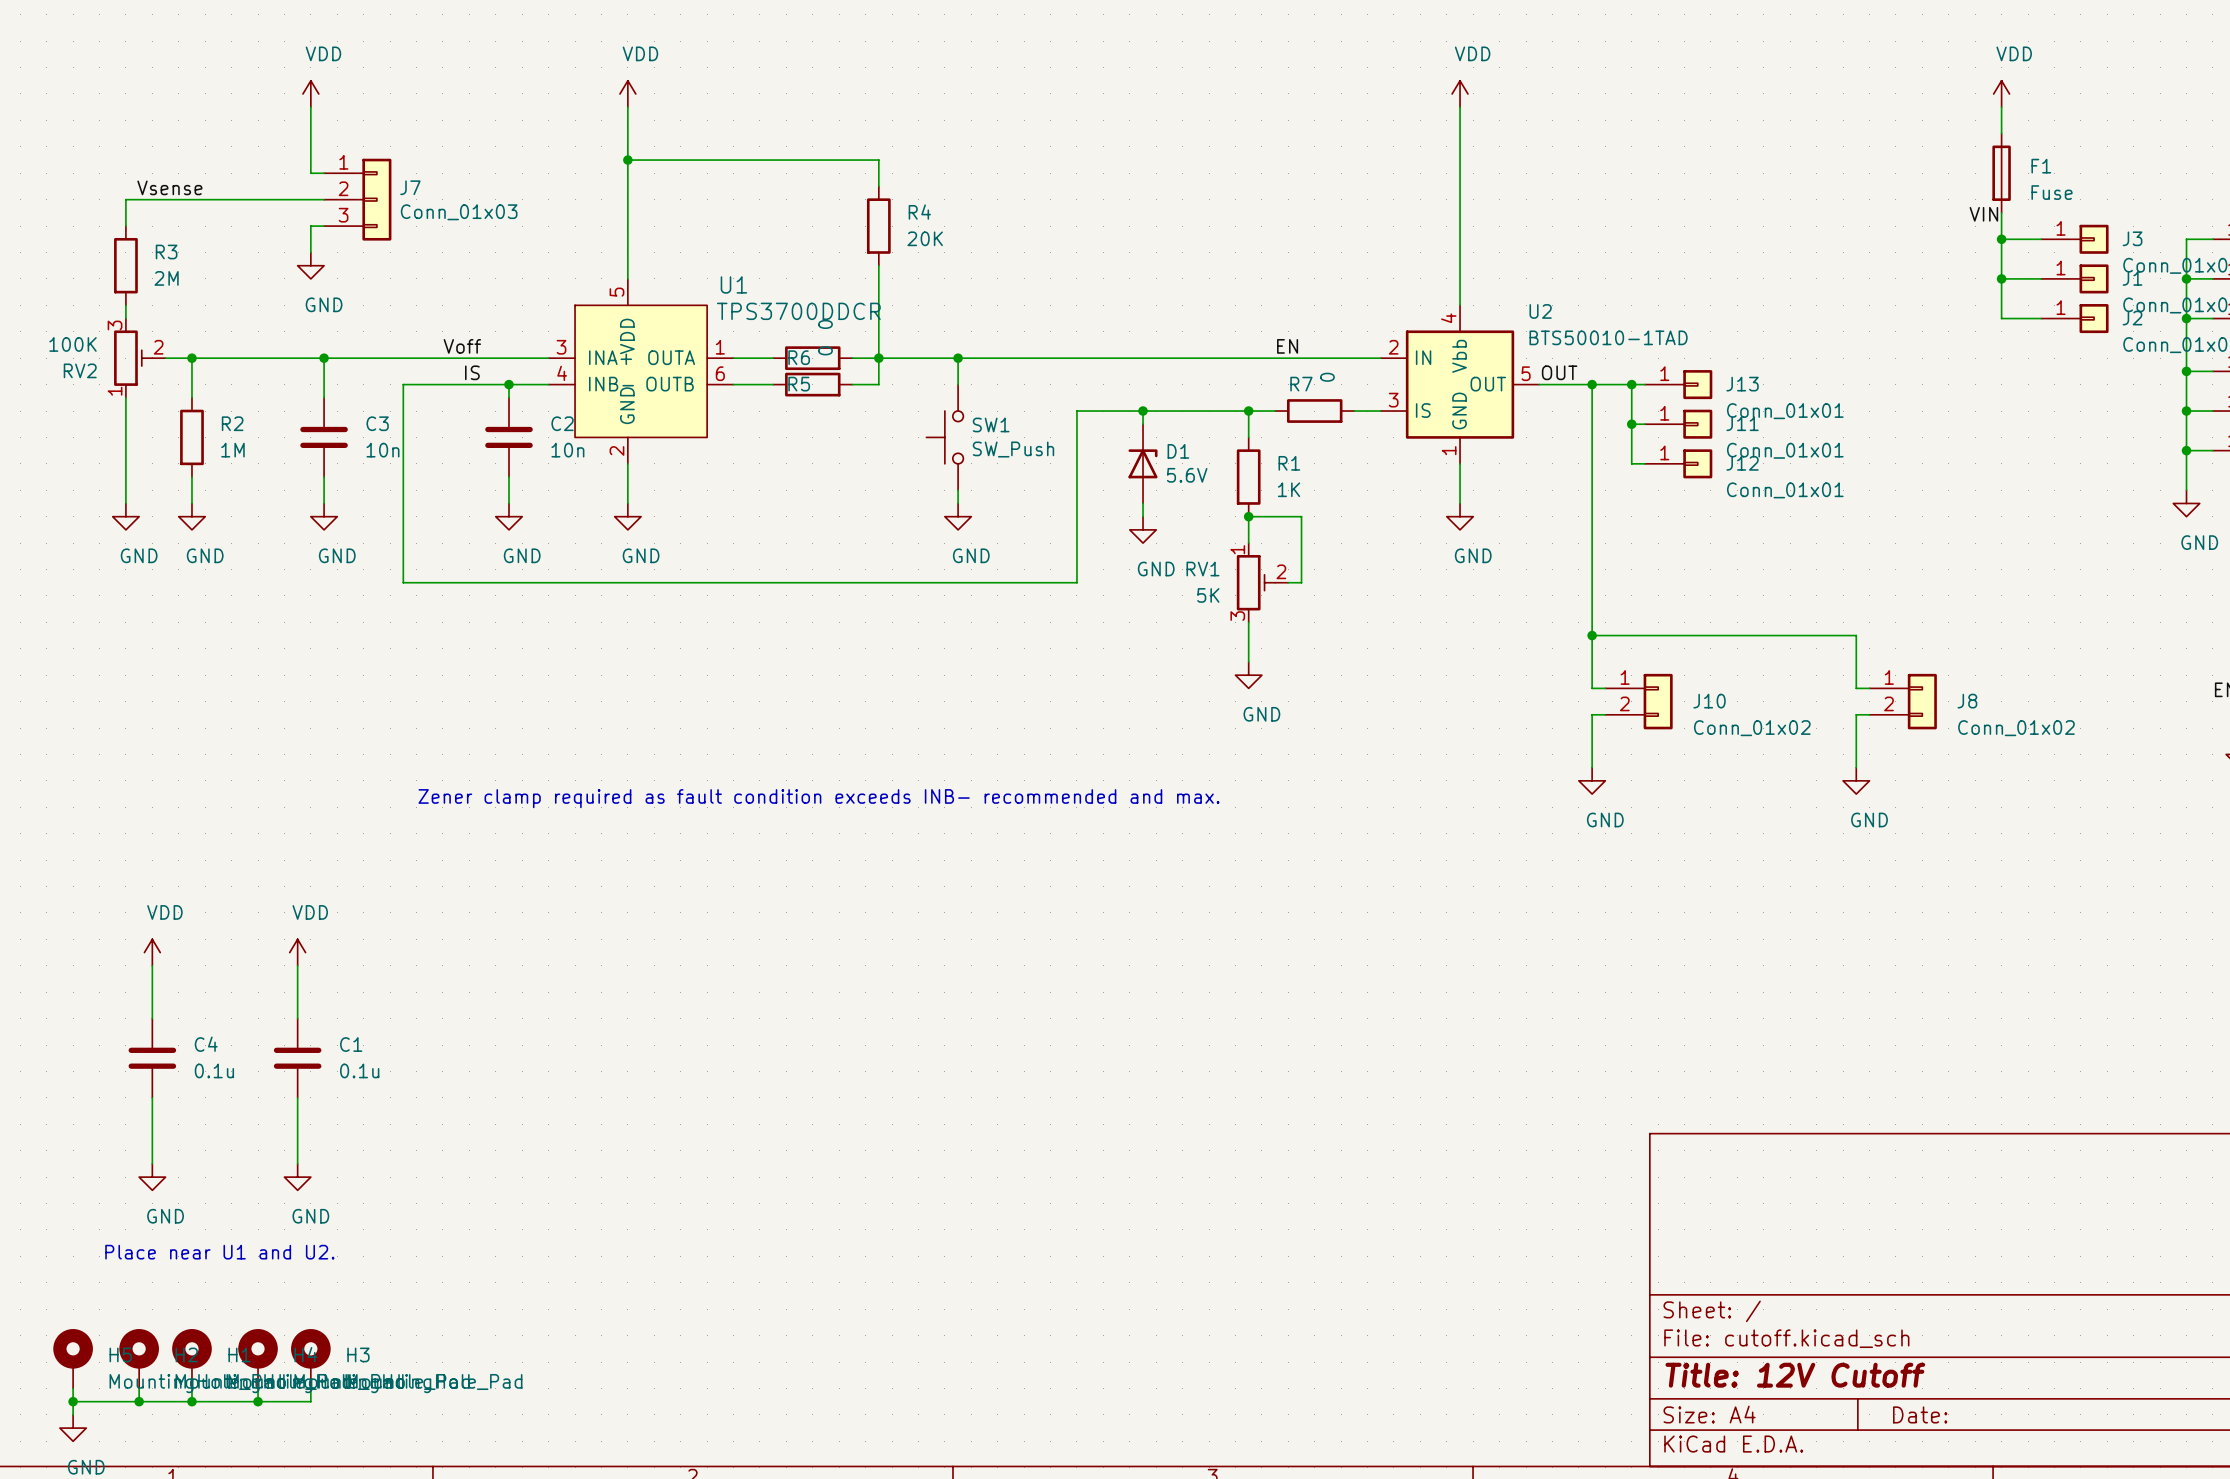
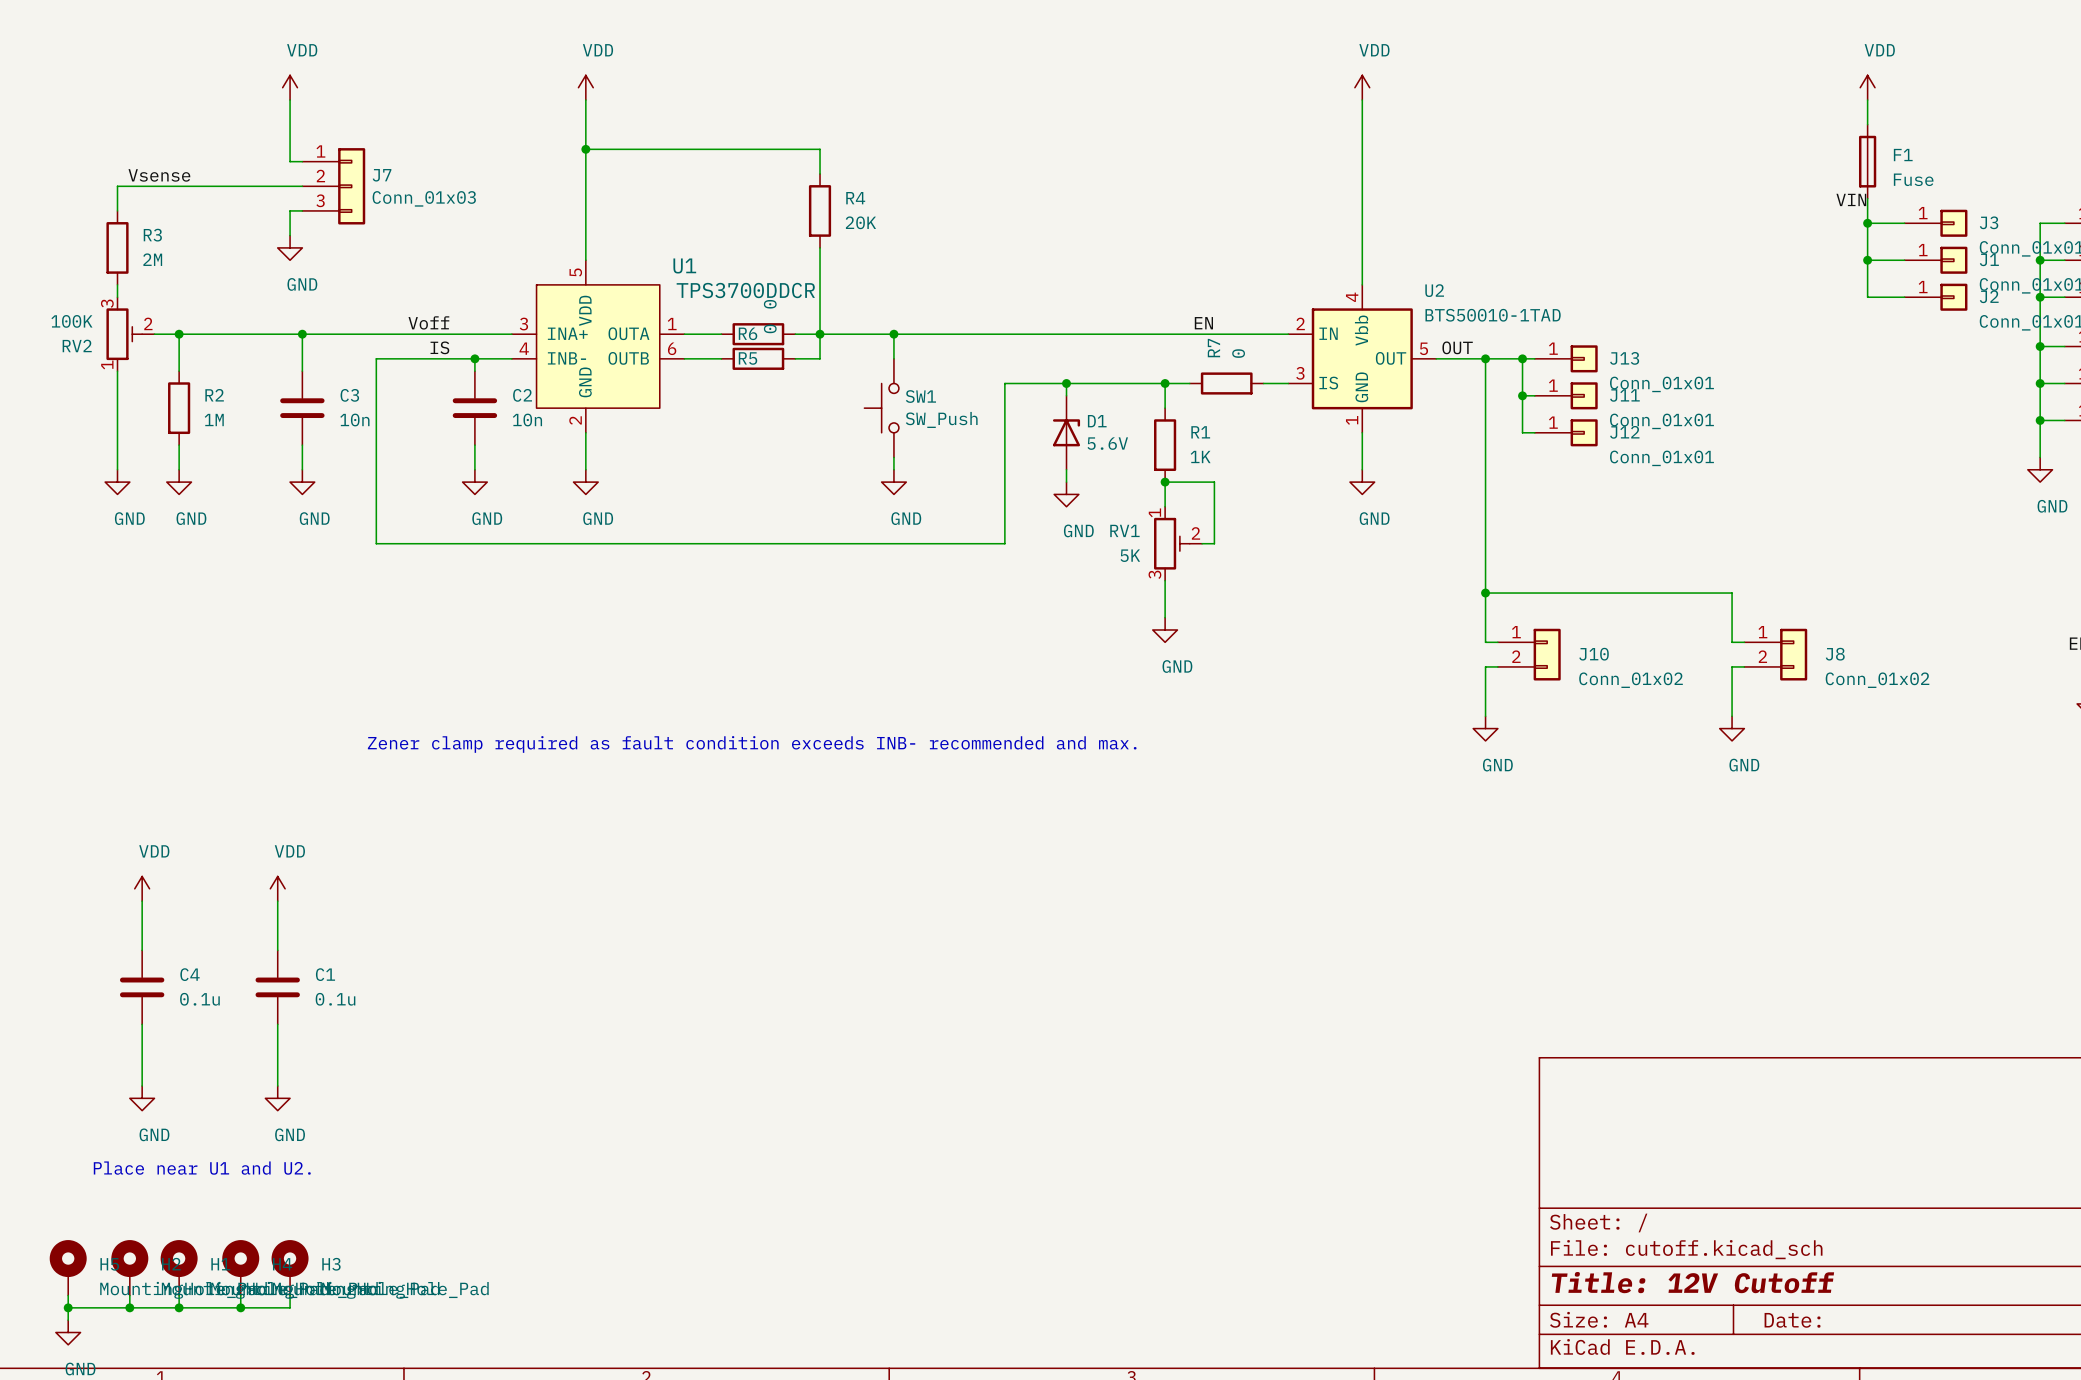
R7 name rotation: 0° (1301, 384) -> 90° counterclockwise (1213, 348)

